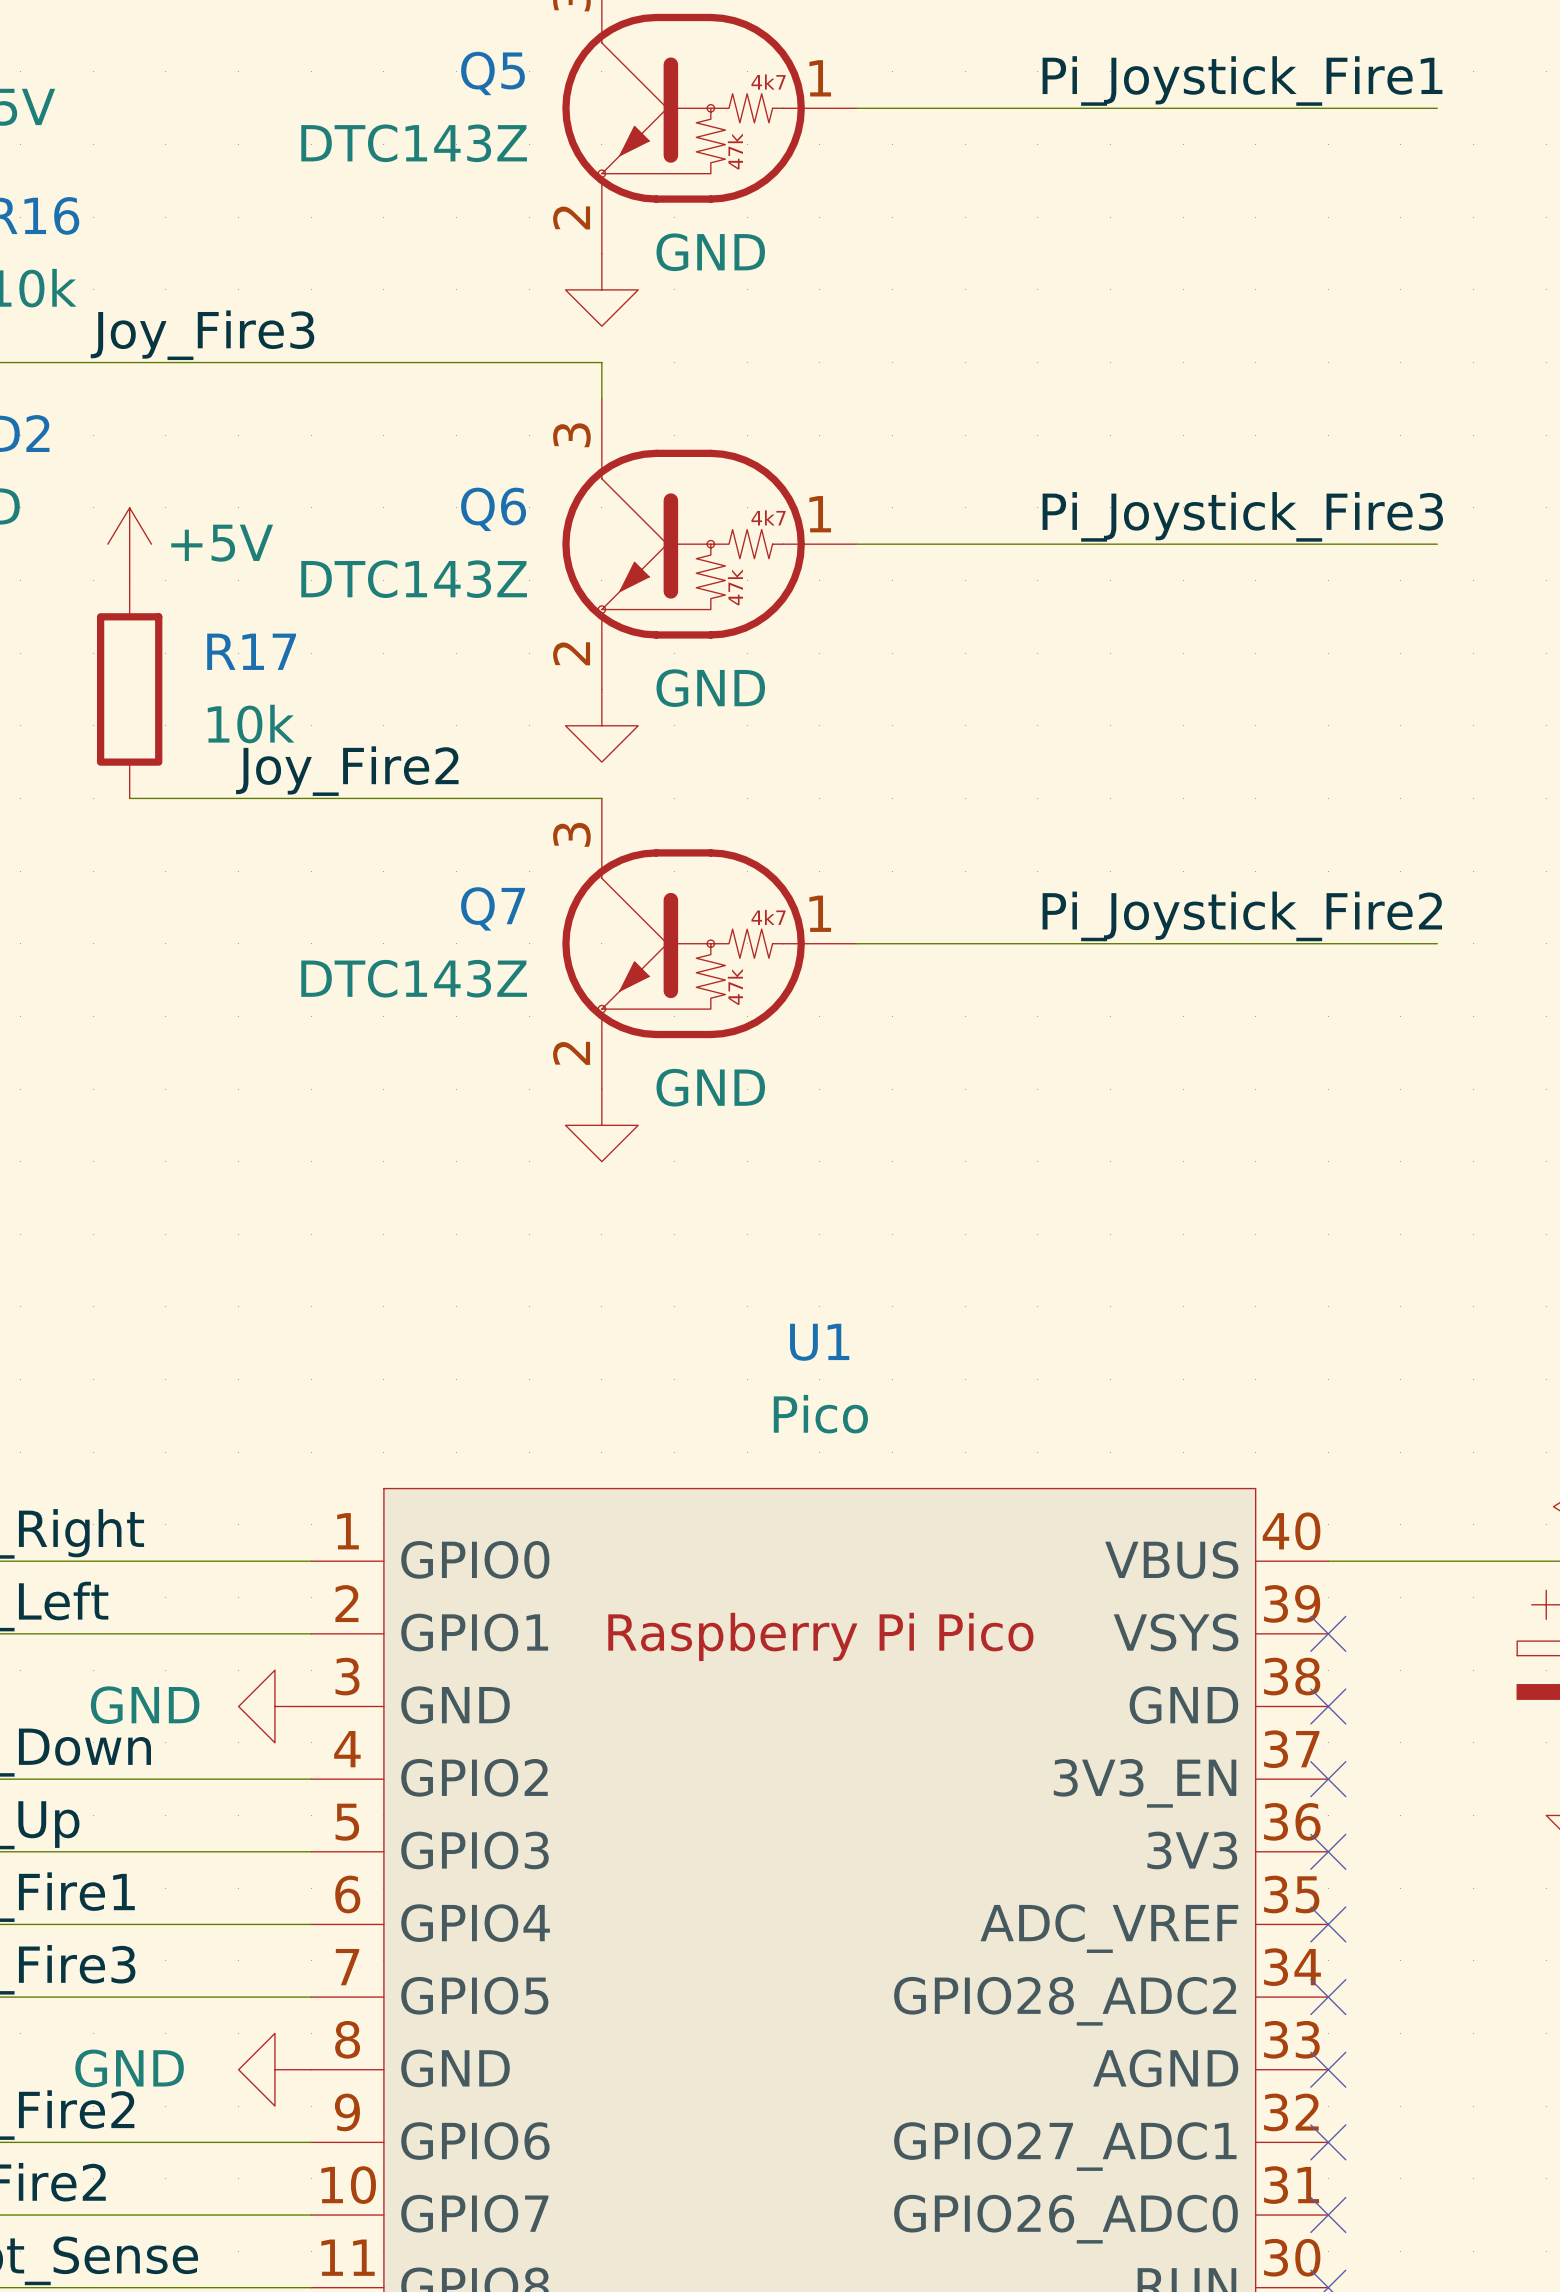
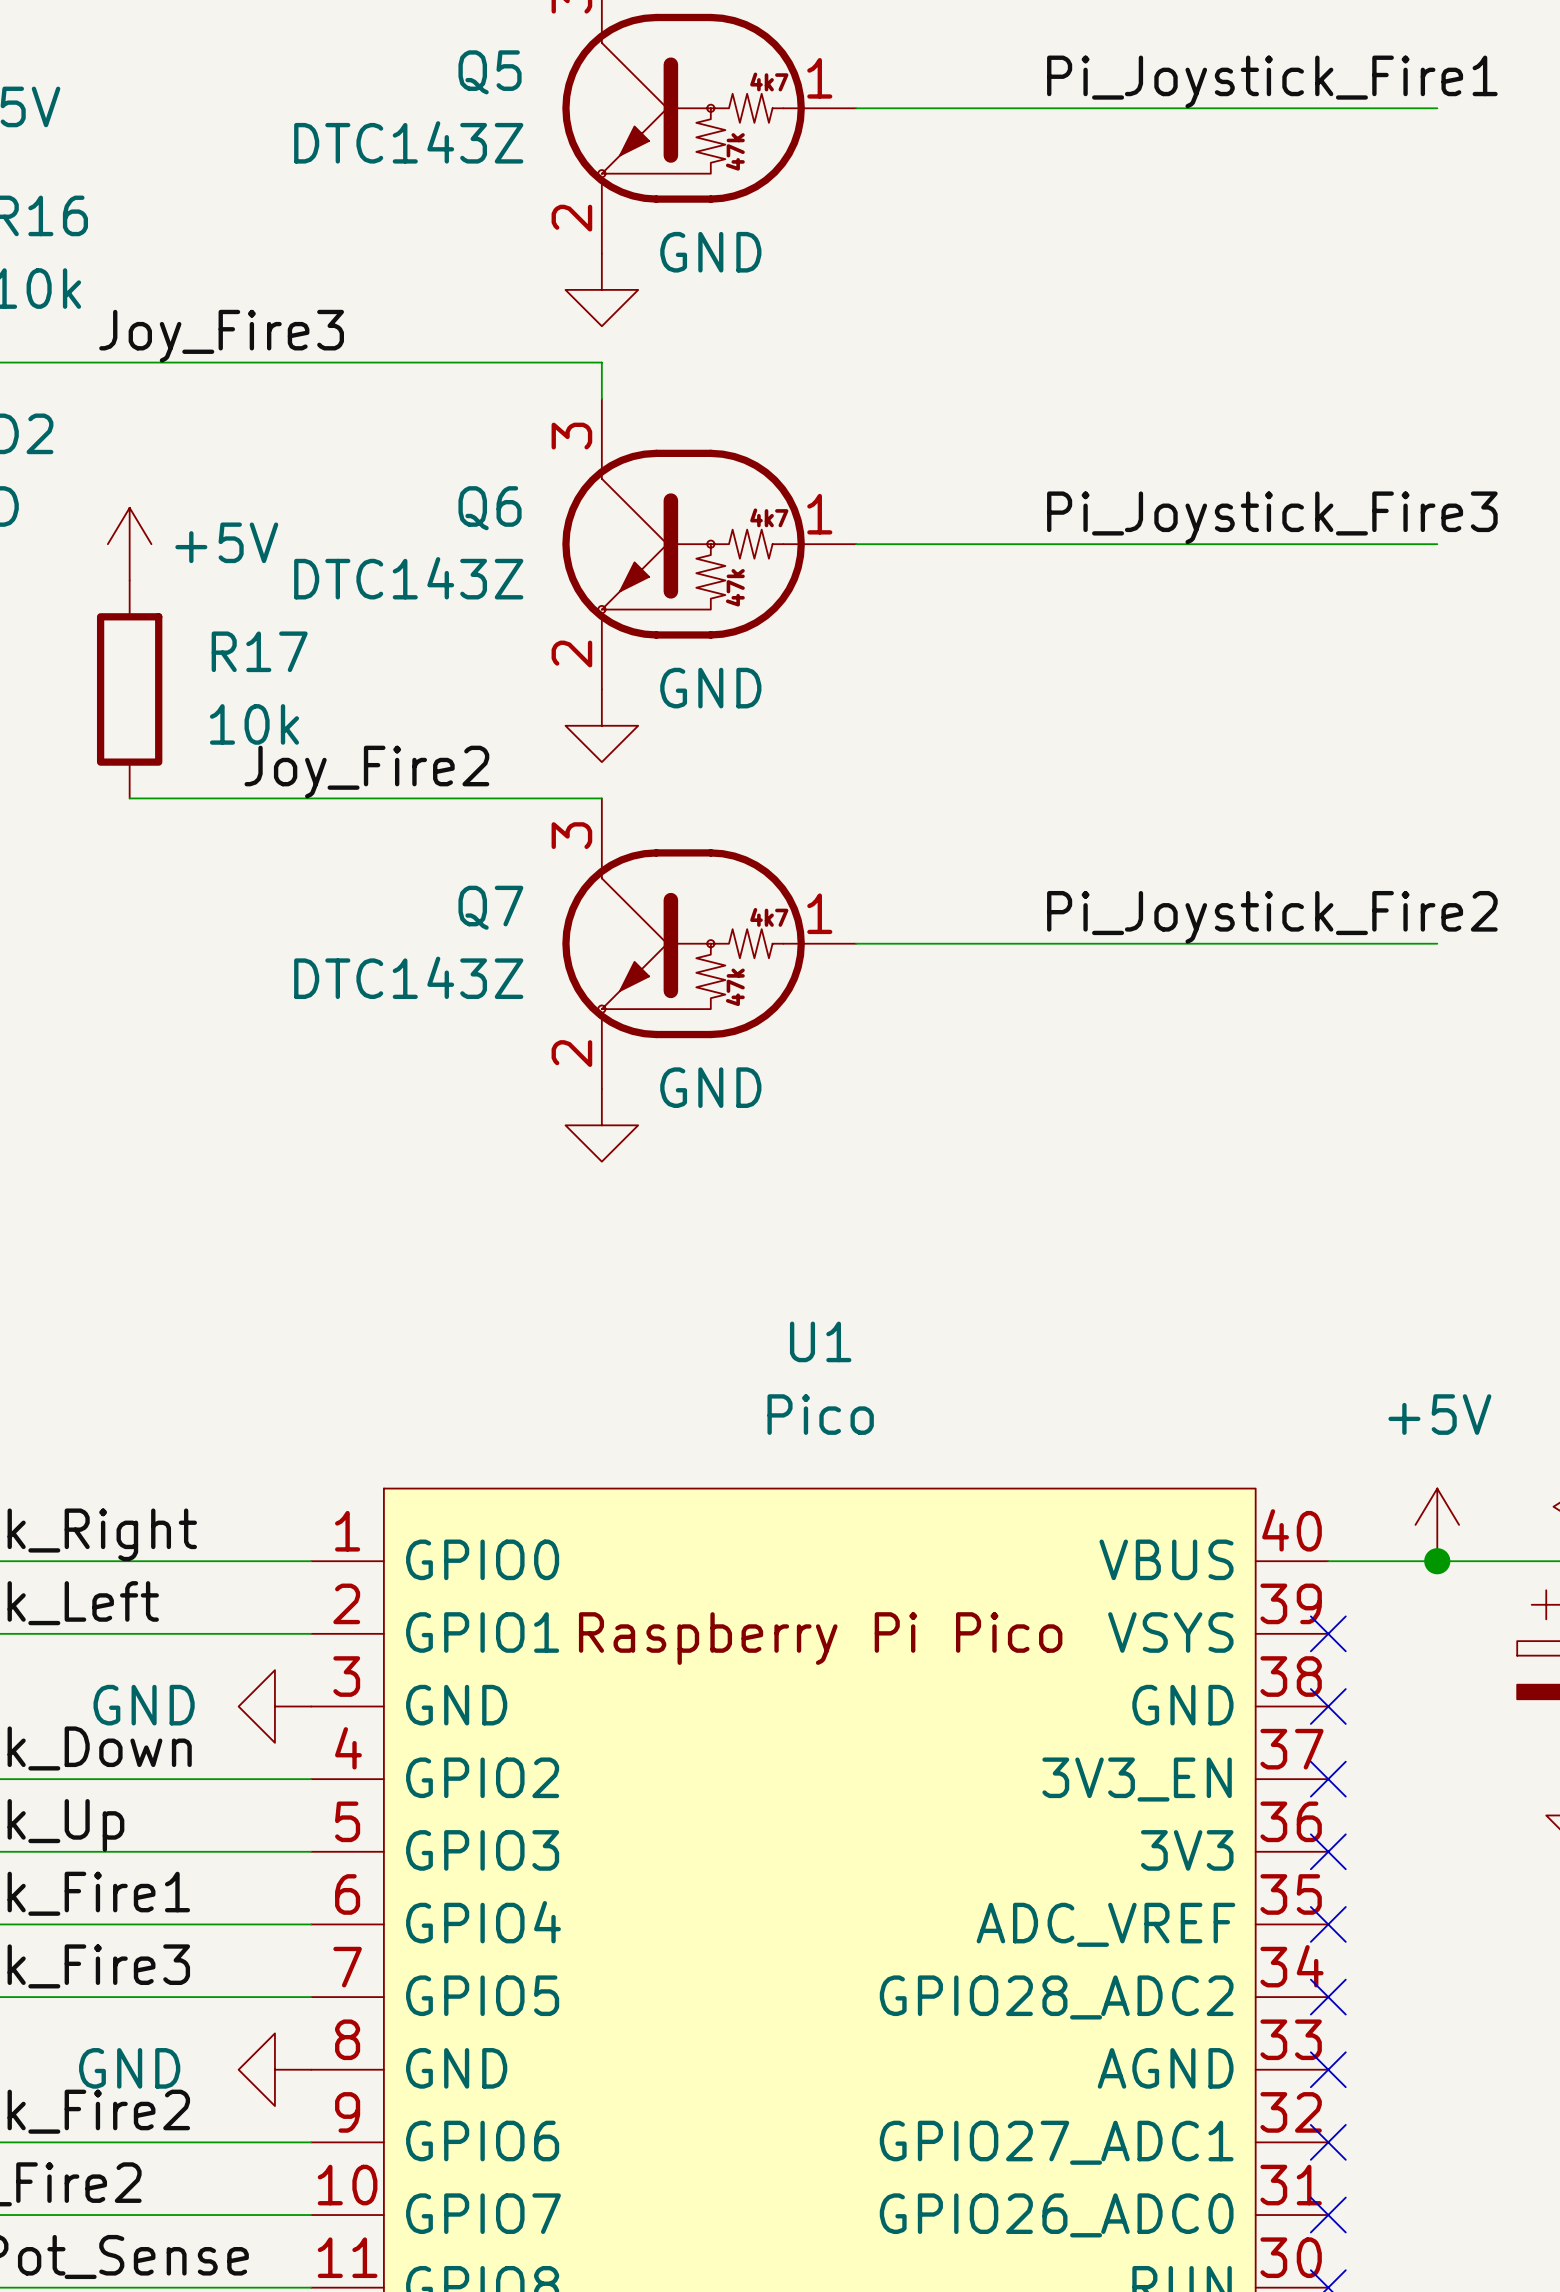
power symbol: none -> +5V (1437, 1524)
junction: none -> (1437, 1561)

